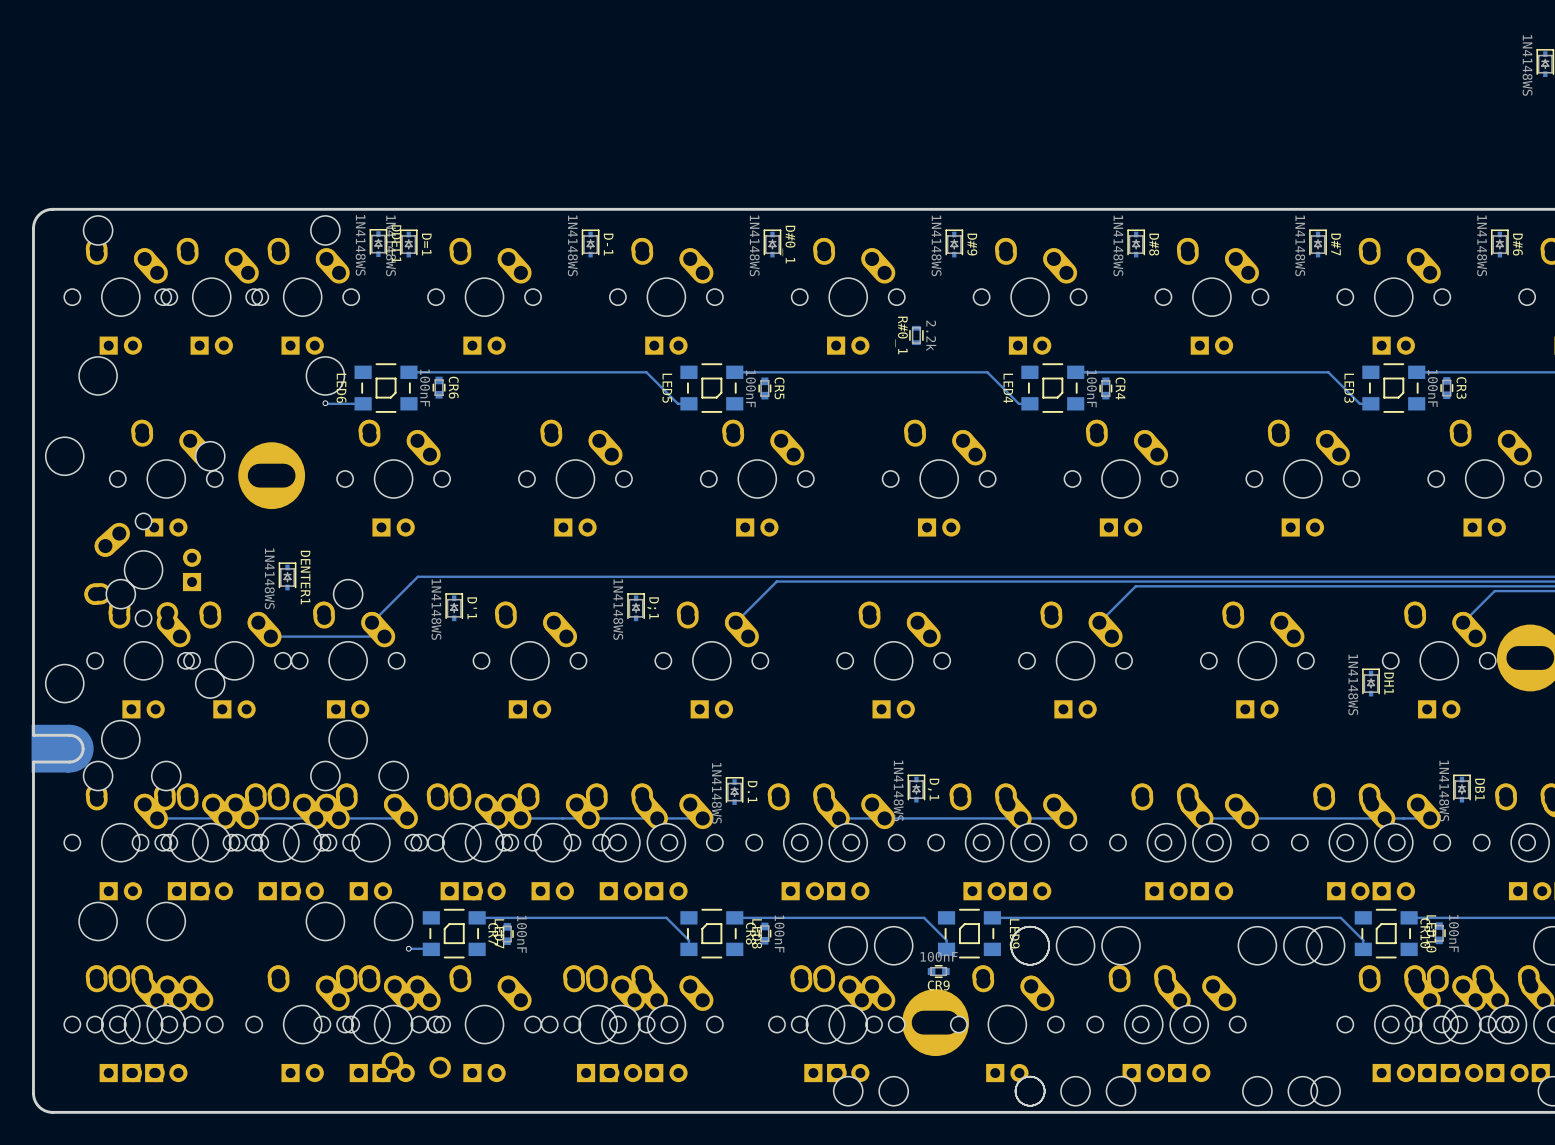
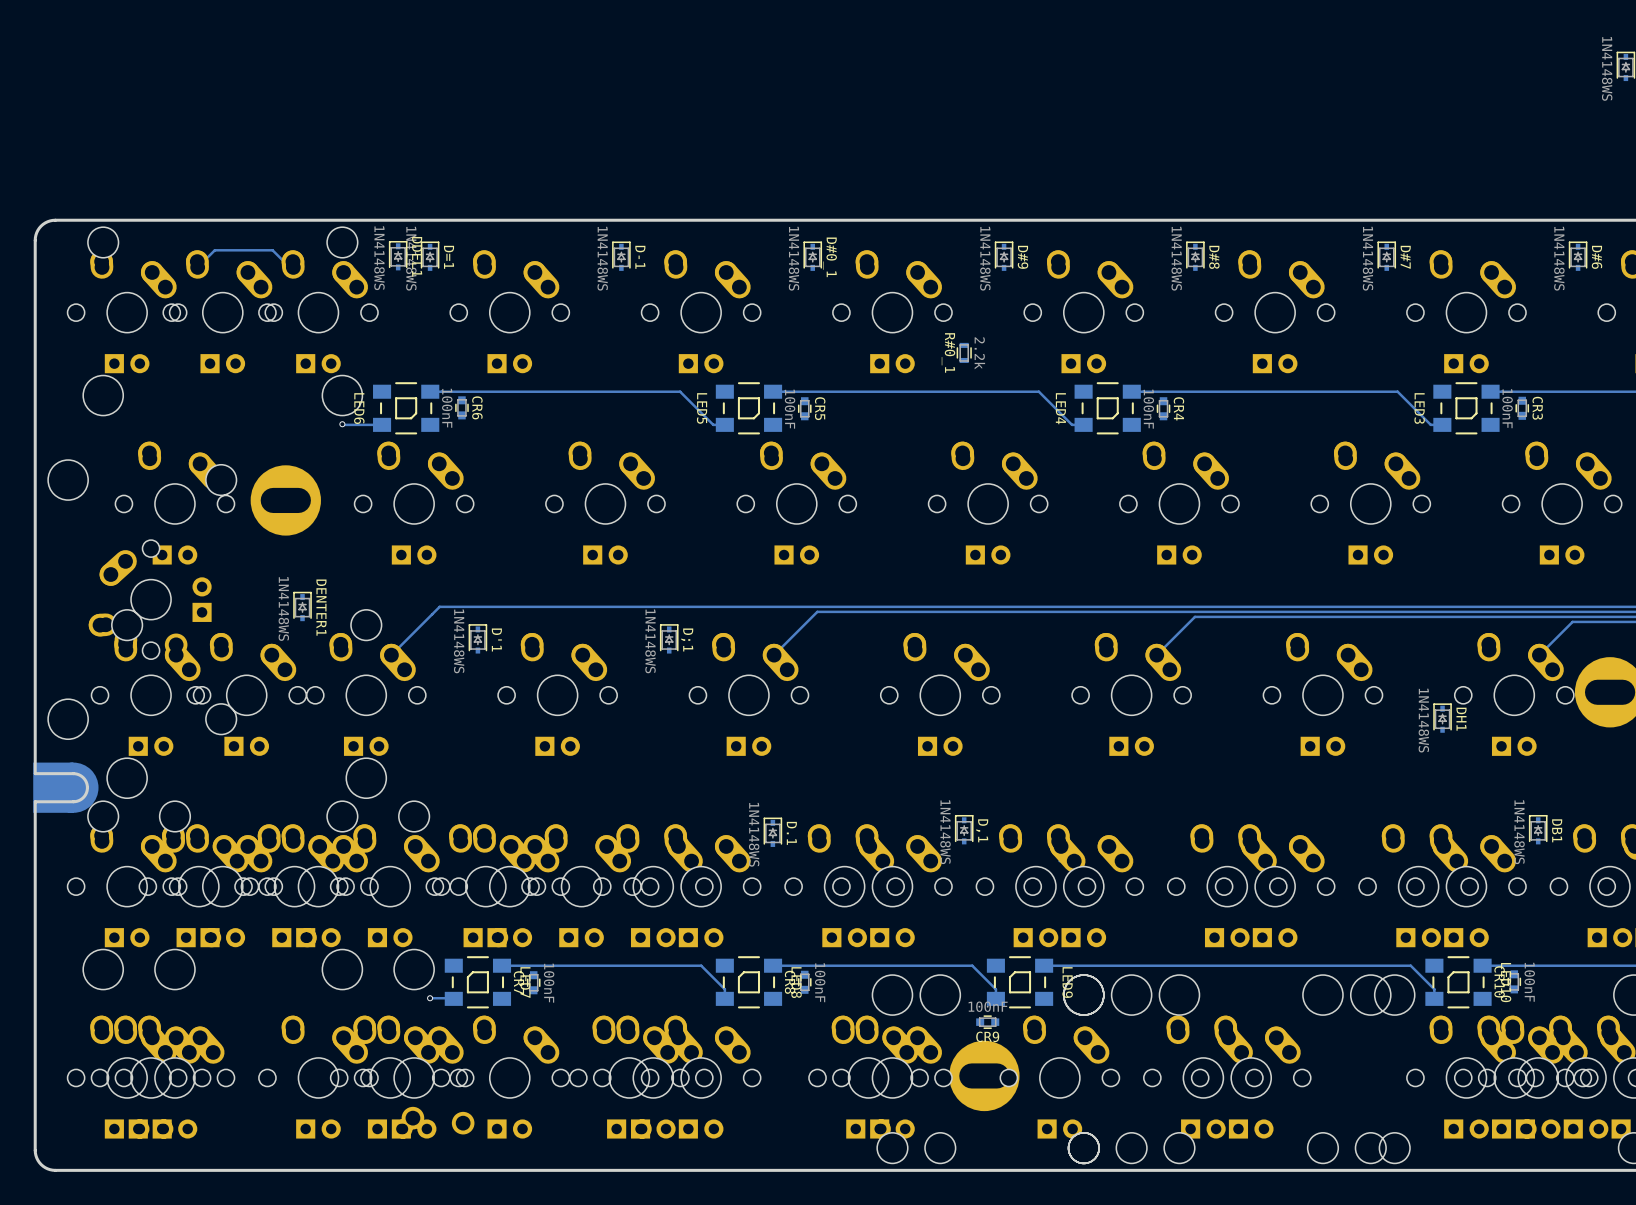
track: none -> (293, 267) (289, 267) (272, 250) (214, 250) (197, 267)
track: (384, 636) (270, 636) -> none
track: (225, 818) (157, 818) -> none
track: (316, 818) (248, 818) -> none
track: (407, 818) (339, 818) -> none
track: (702, 818) (520, 818) -> none
track: (1007, 818) (839, 818) -> none
track: (1066, 818) (1020, 818) -> none
track: (1430, 818) (1202, 818) -> none

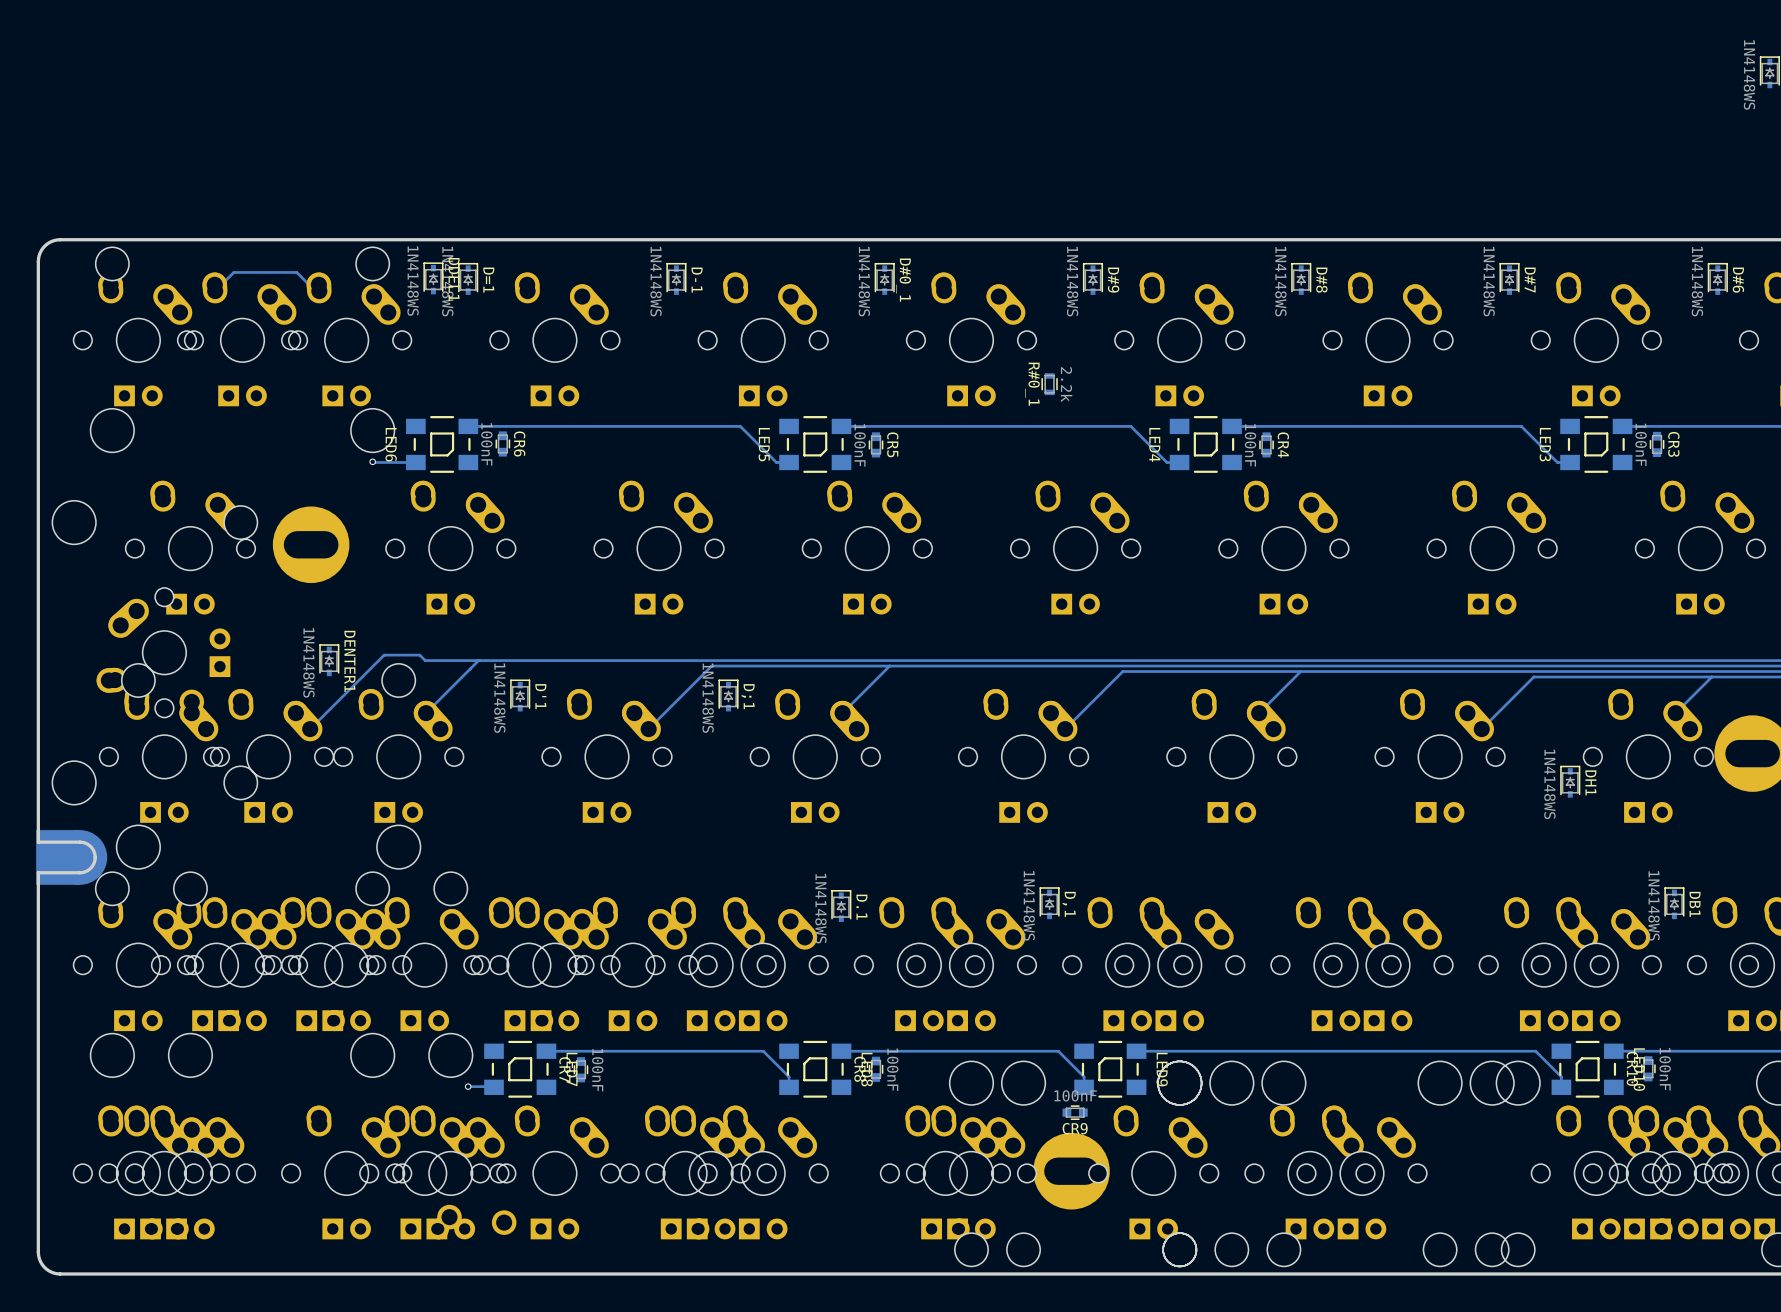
track: none -> (478, 660) (425, 660) (419, 655) (384, 655) (310, 729)
track: none -> (889, 666) (711, 666) (648, 729)
track: none -> (1300, 671) (1122, 671) (1065, 729)
track: none -> (1711, 676) (1533, 676) (1481, 729)

